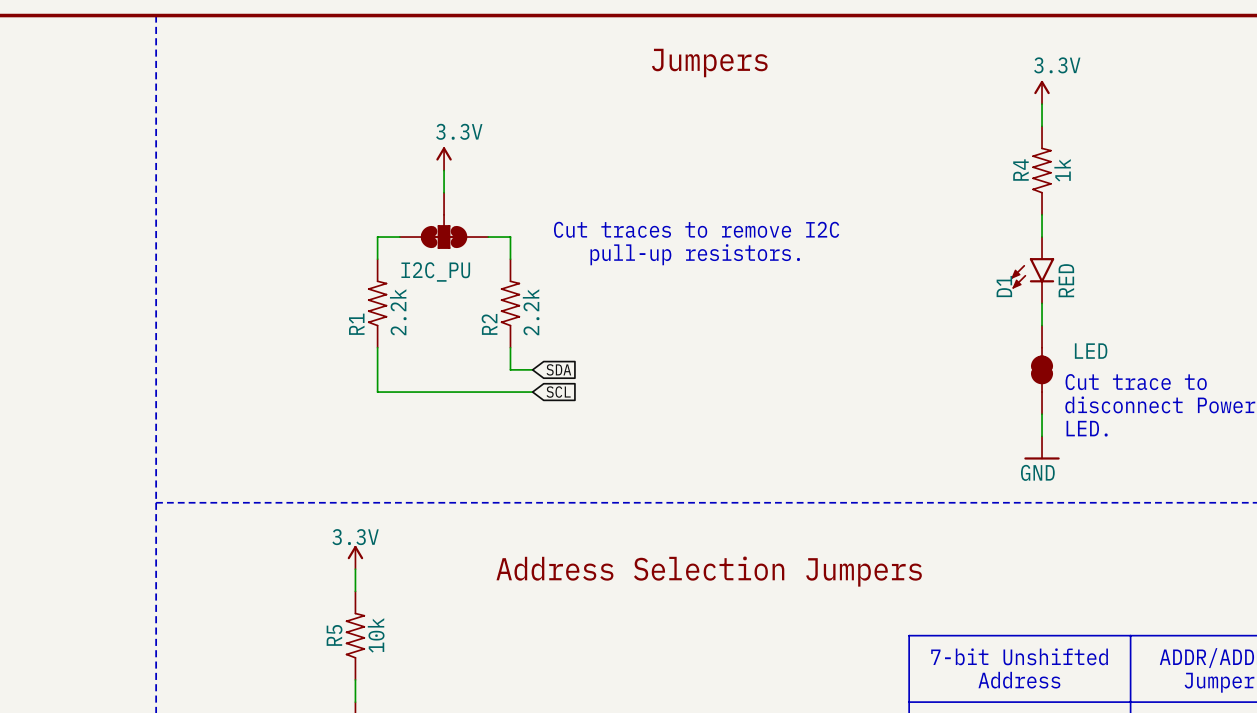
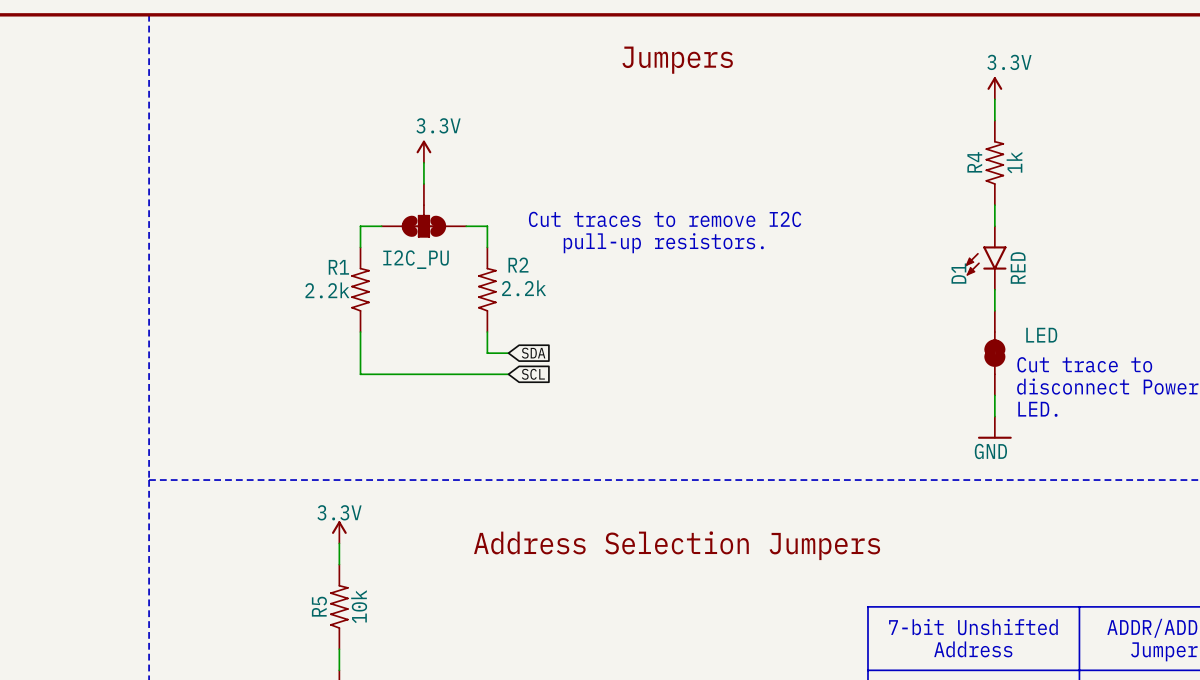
R1 value rotation: 0° (398, 312) -> 90° clockwise (327, 290)
R1 value position: 2.2k (398, 312) -> 2.2k (327, 290)
R2 value rotation: 0° (531, 312) -> 90° clockwise (524, 288)
R1 name rotation: 0° (356, 324) -> 90° clockwise (338, 267)
R1 name position: R1 (356, 324) -> R1 (338, 267)
R2 name rotation: 0° (489, 324) -> 90° clockwise (518, 265)
R2 name position: R2 (489, 324) -> R2 (518, 265)

